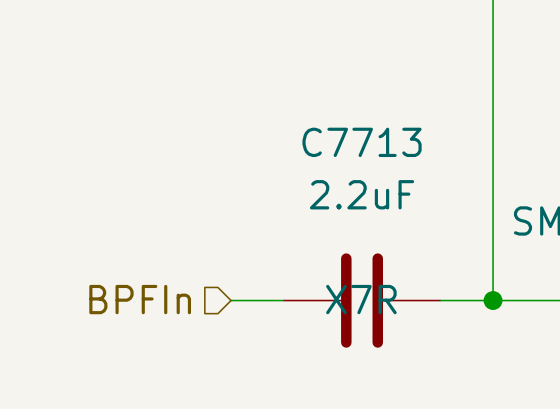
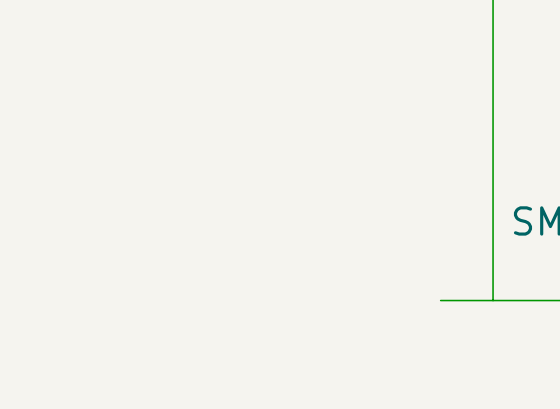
hierarchical label: BPFIn (140, 299) -> none
wire: (231, 300) (283, 300) -> none
C7713: 2.2uF (362, 300) -> none
junction: (493, 300) -> none

